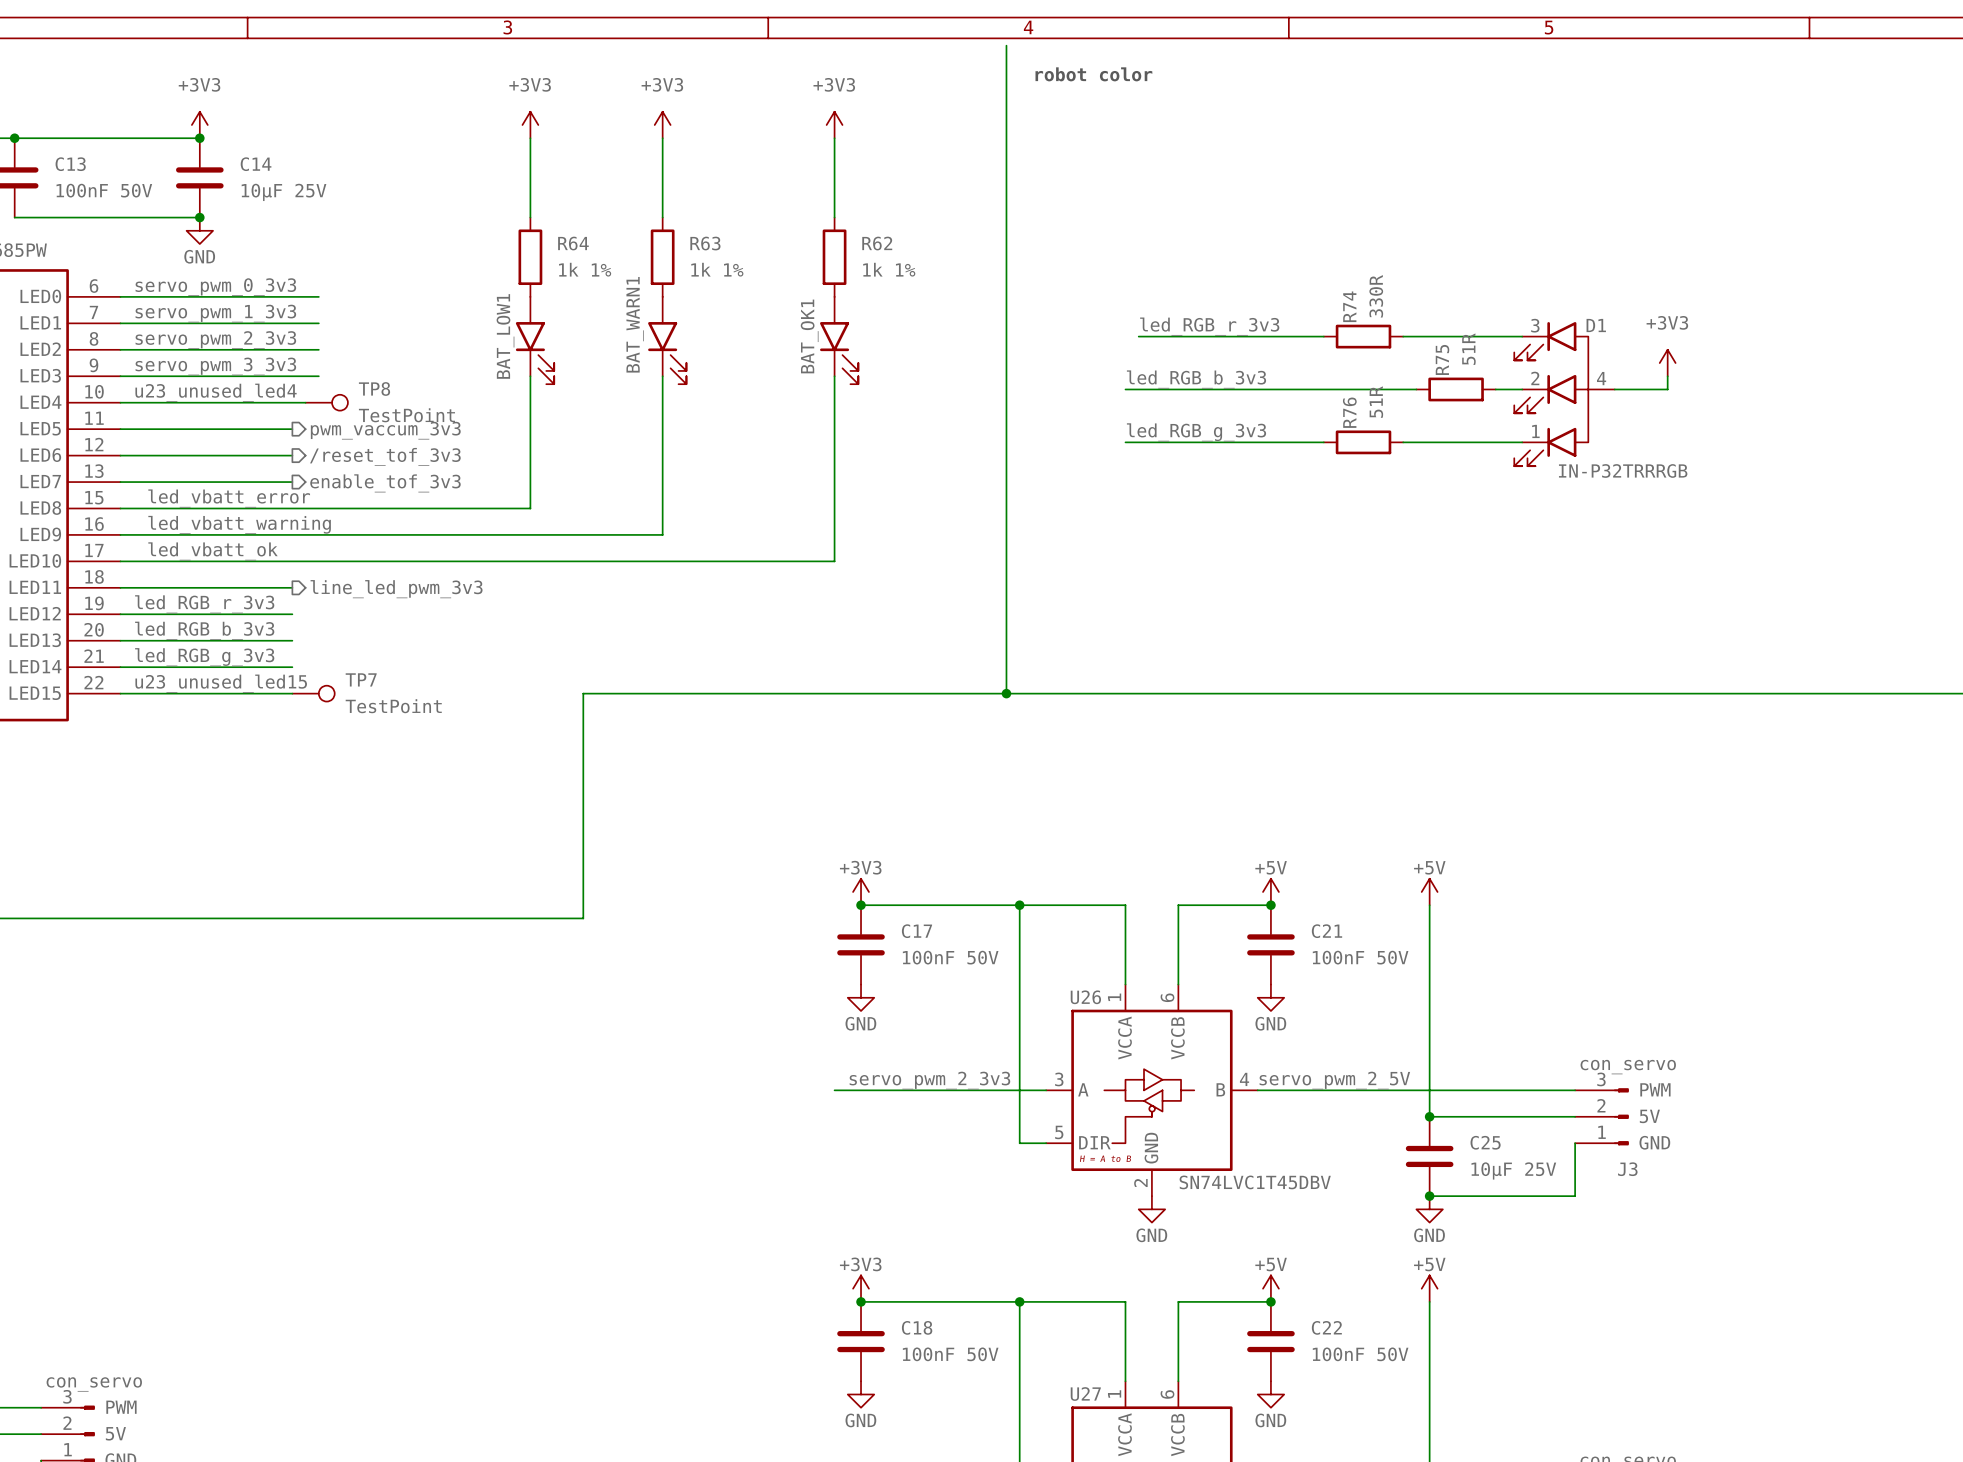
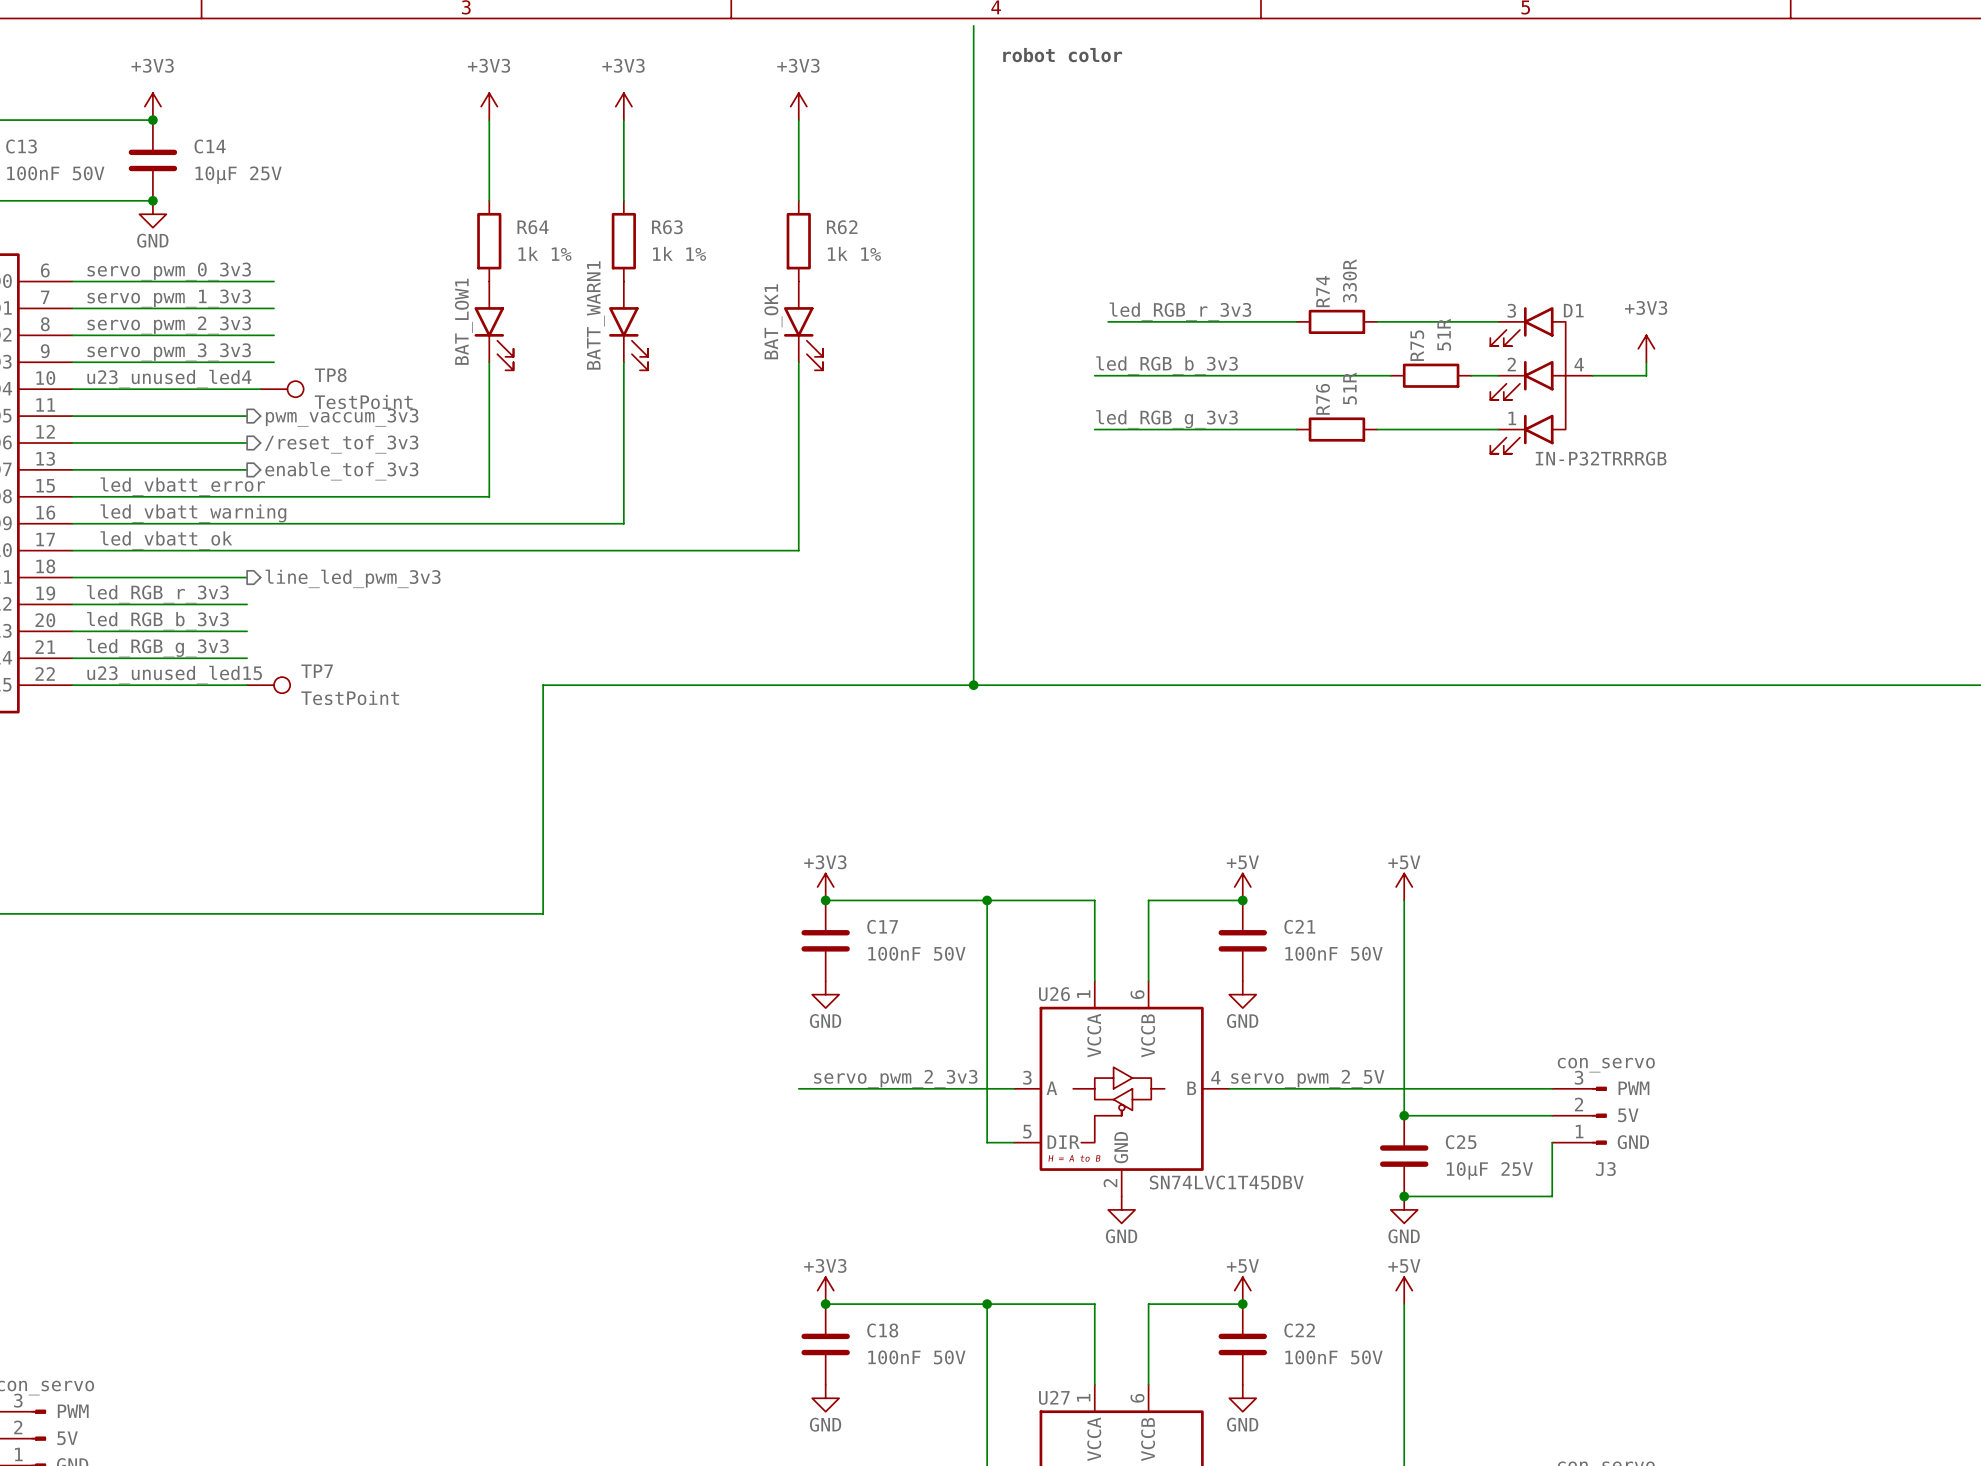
BAT_WARN1 name: BAT_WARN1 (635, 324) -> BATT_WARN1 (595, 315)

